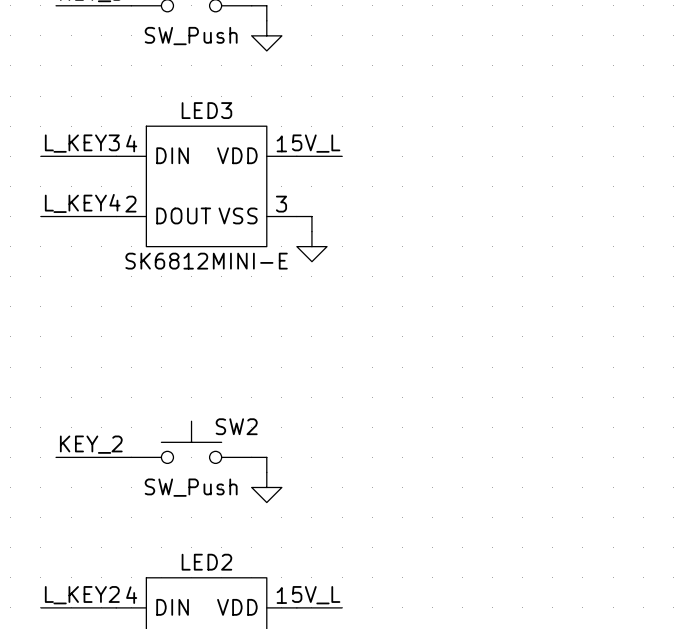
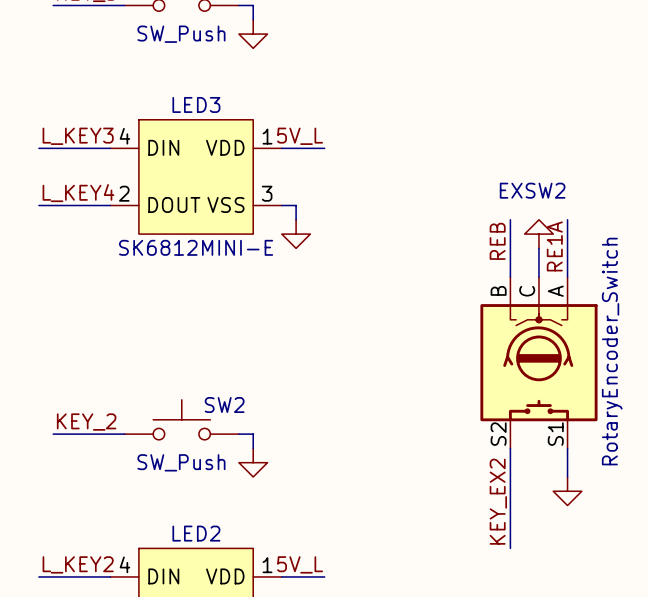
wire: none -> (510, 219) (510, 276)
wire: none -> (567, 219) (567, 276)
power symbol: none -> (538, 234)
label: none -> REB (497, 241)
label: none -> RE1A (554, 246)
wire: none -> (538, 248) (538, 276)
EXSW2: none -> RotaryEncoder_Switch (538, 362)
wire: none -> (510, 448) (510, 548)
wire: none -> (567, 448) (567, 476)
power symbol: none -> (567, 491)
label: none -> KEY_EX2 (498, 501)

